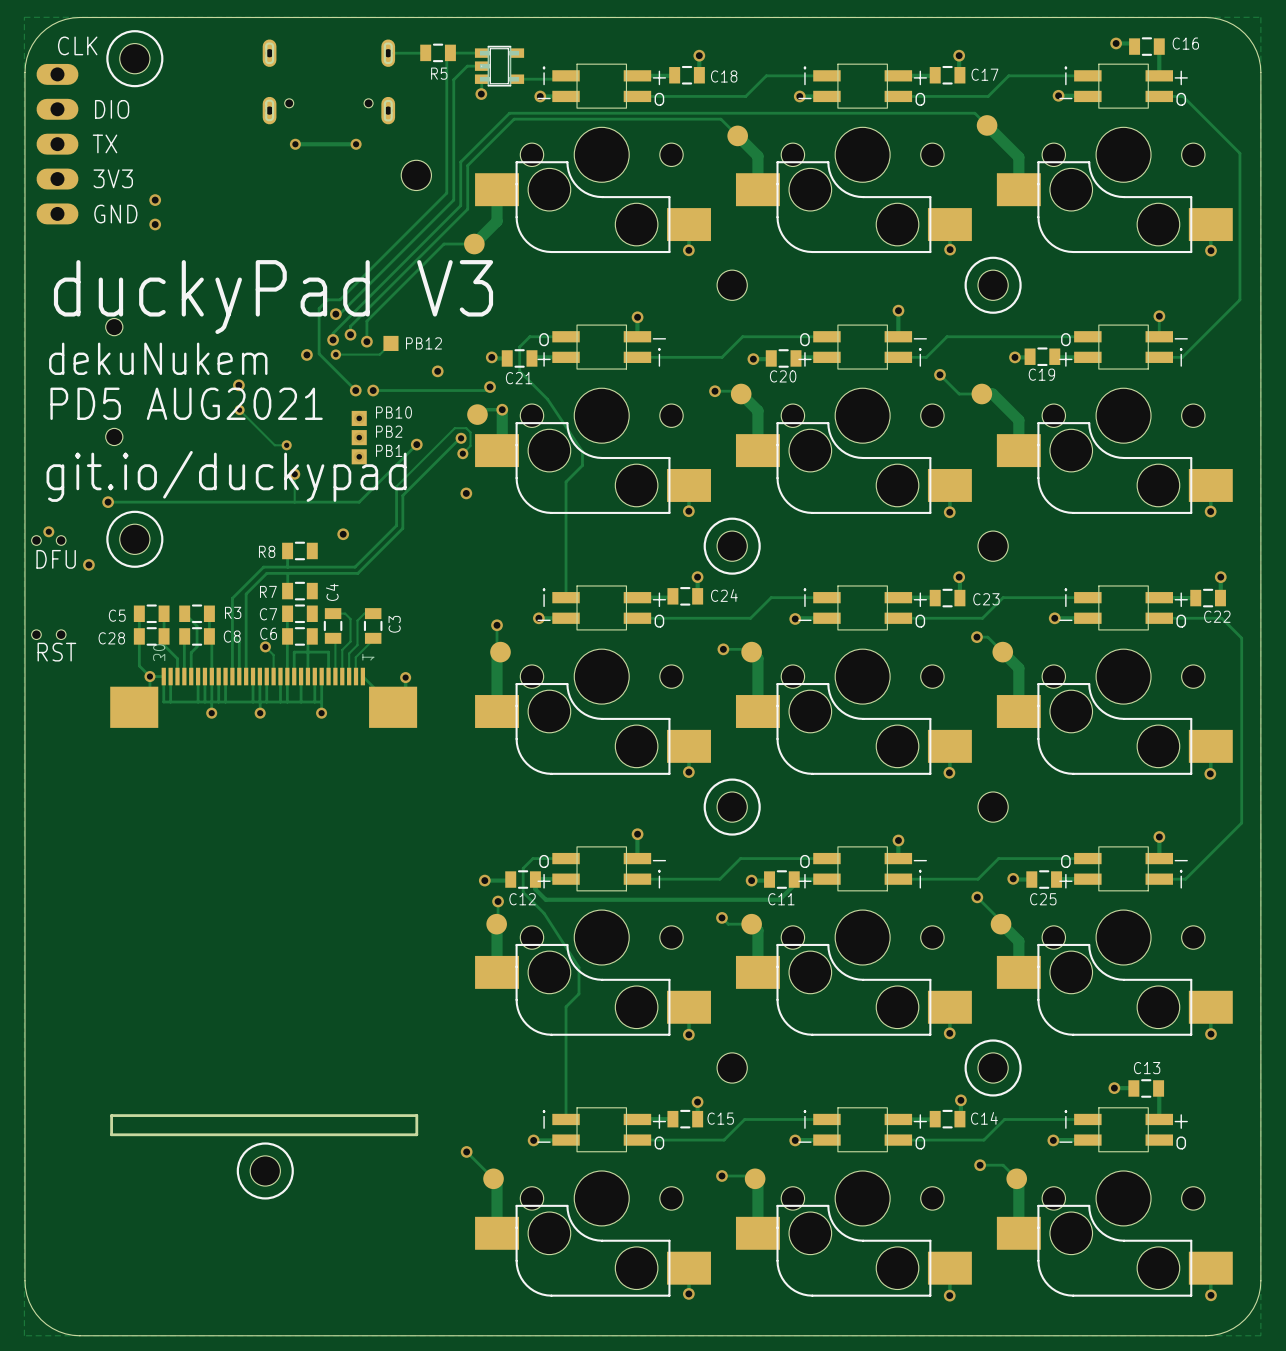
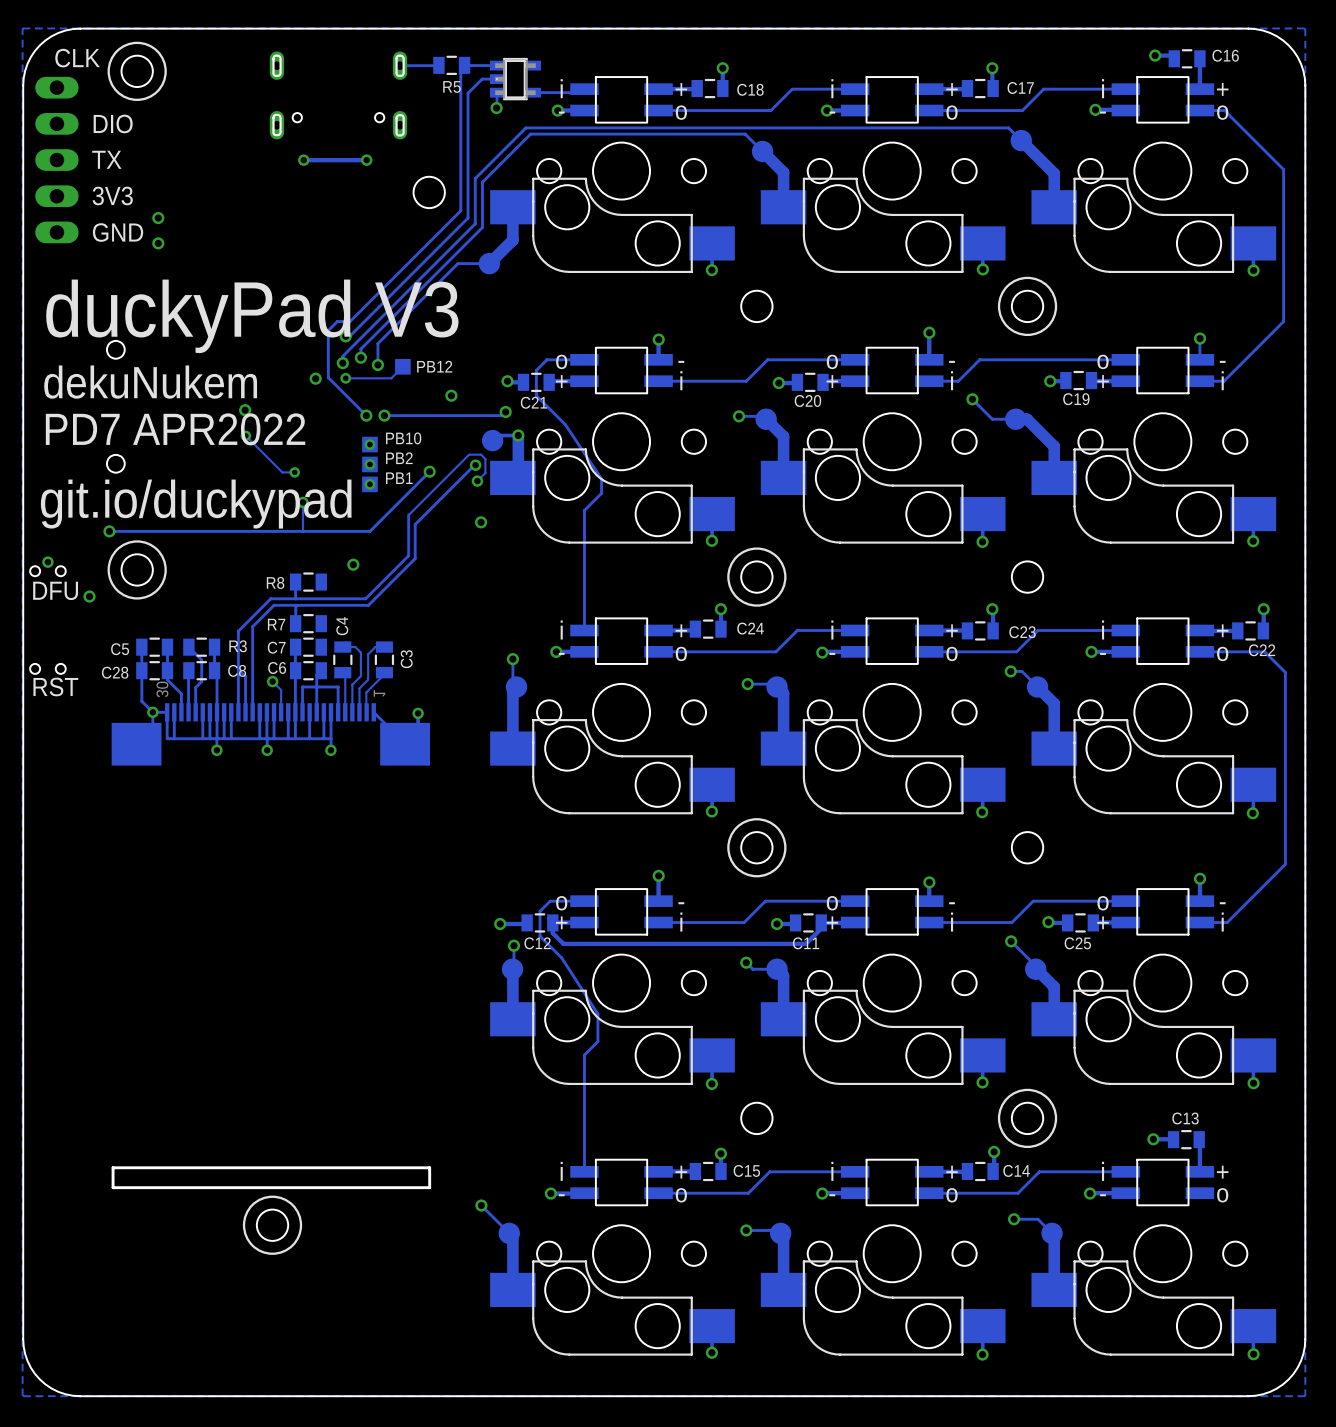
text: PD5 AUG2021 (186, 403) -> PD7 APR2022 (175, 429)

